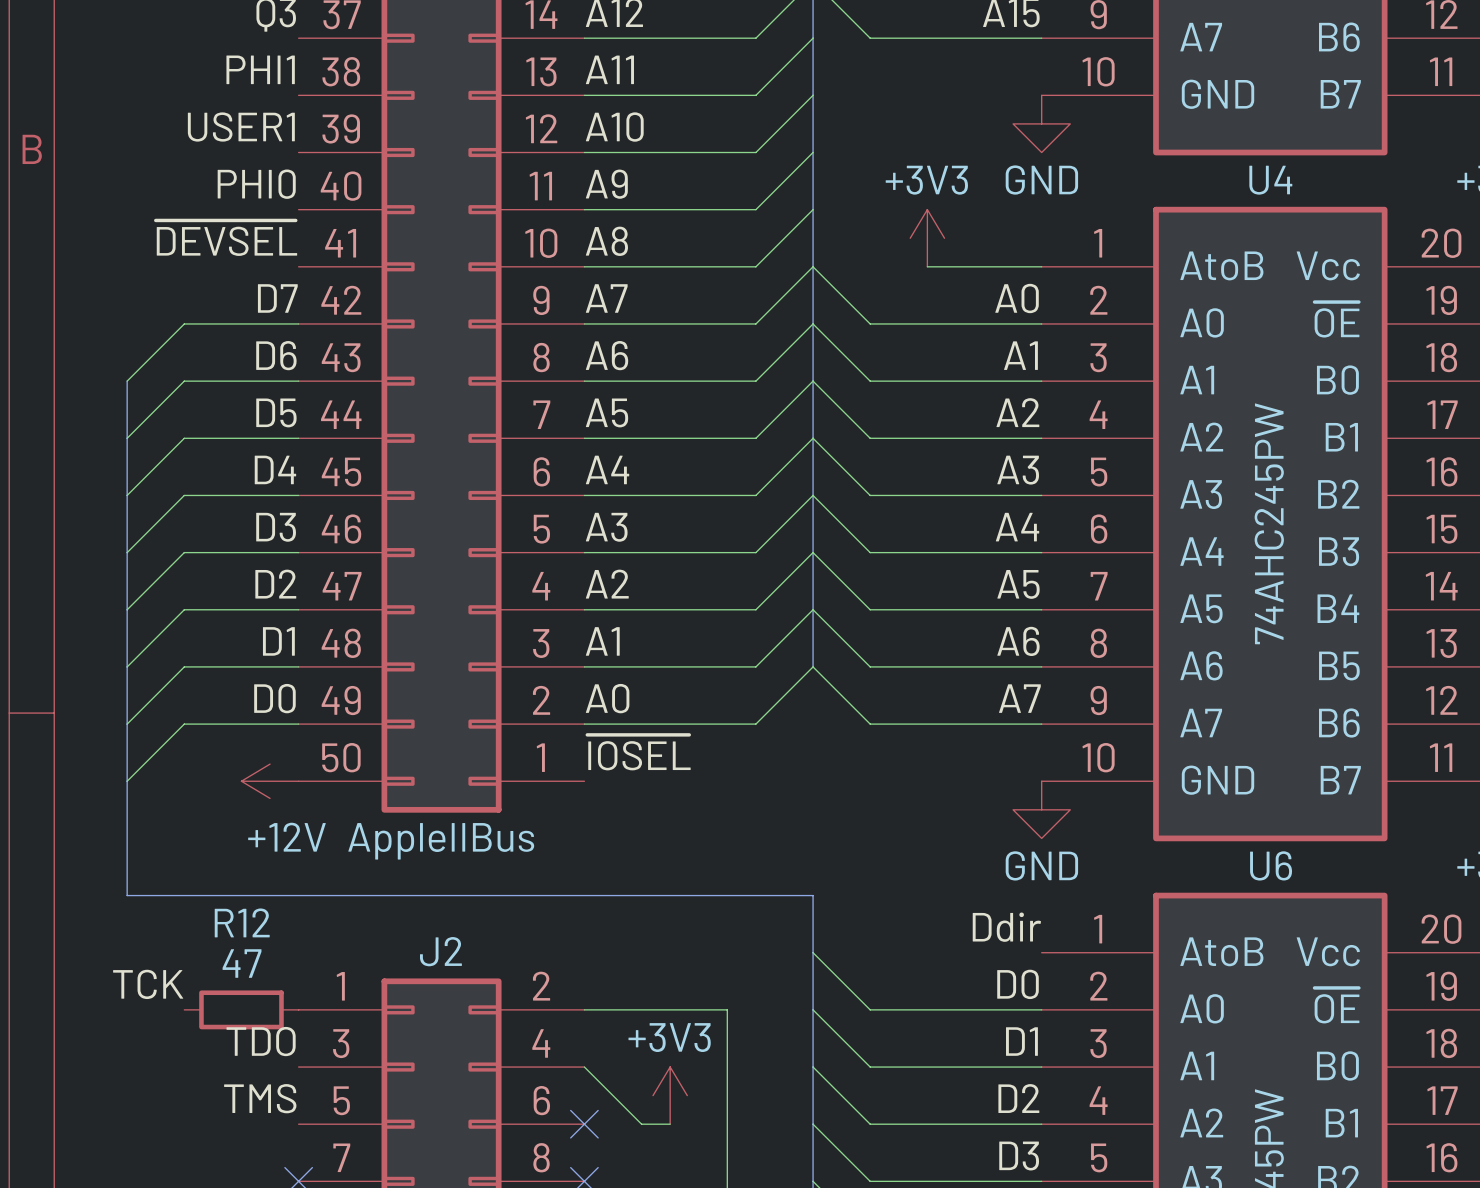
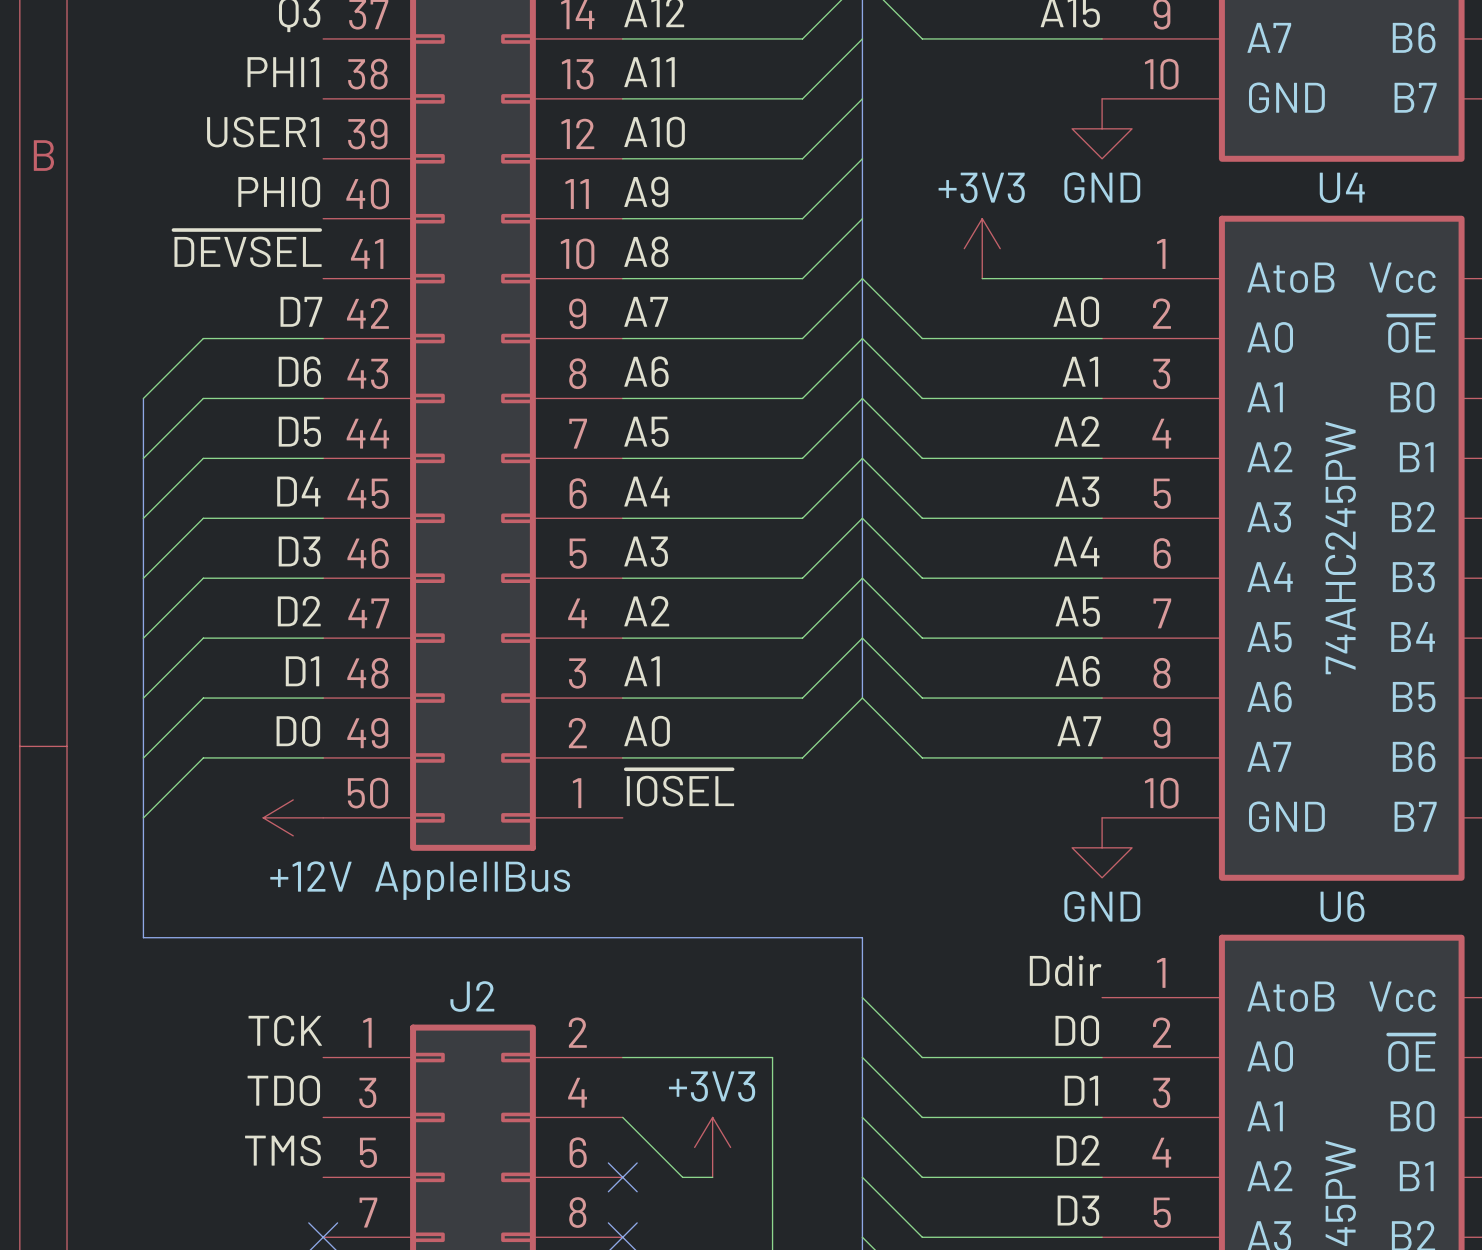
label position: TCK (148, 984) -> TCK (285, 1030)
R12: 47 (241, 1009) -> none

